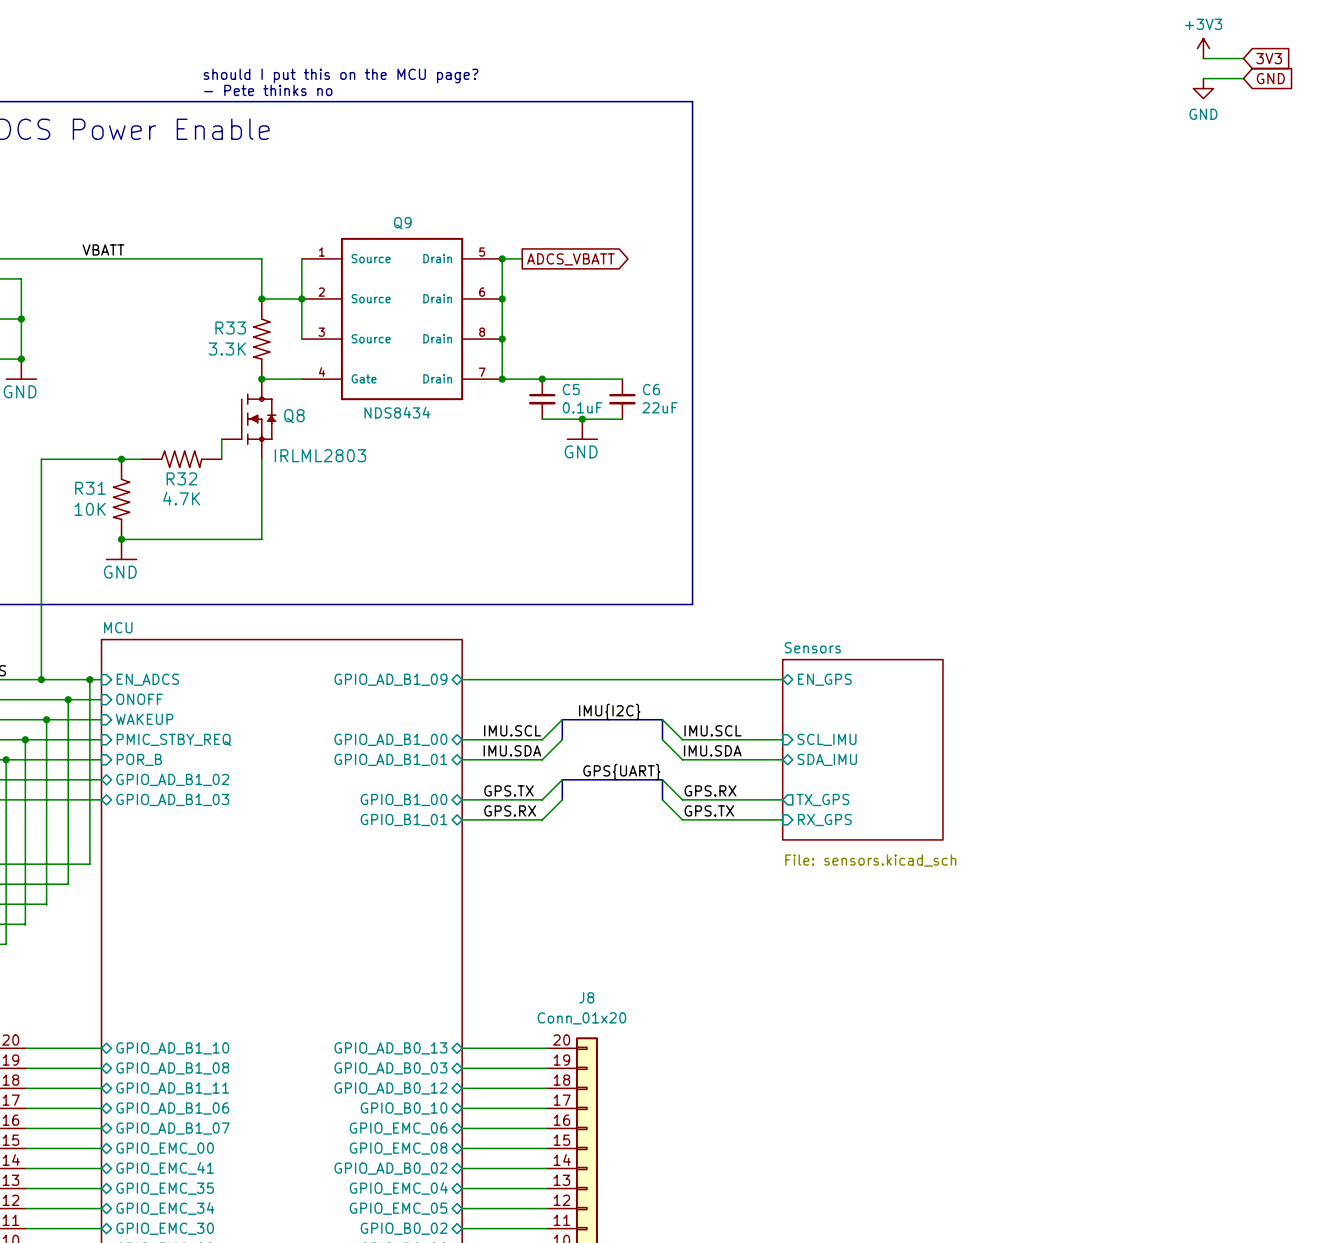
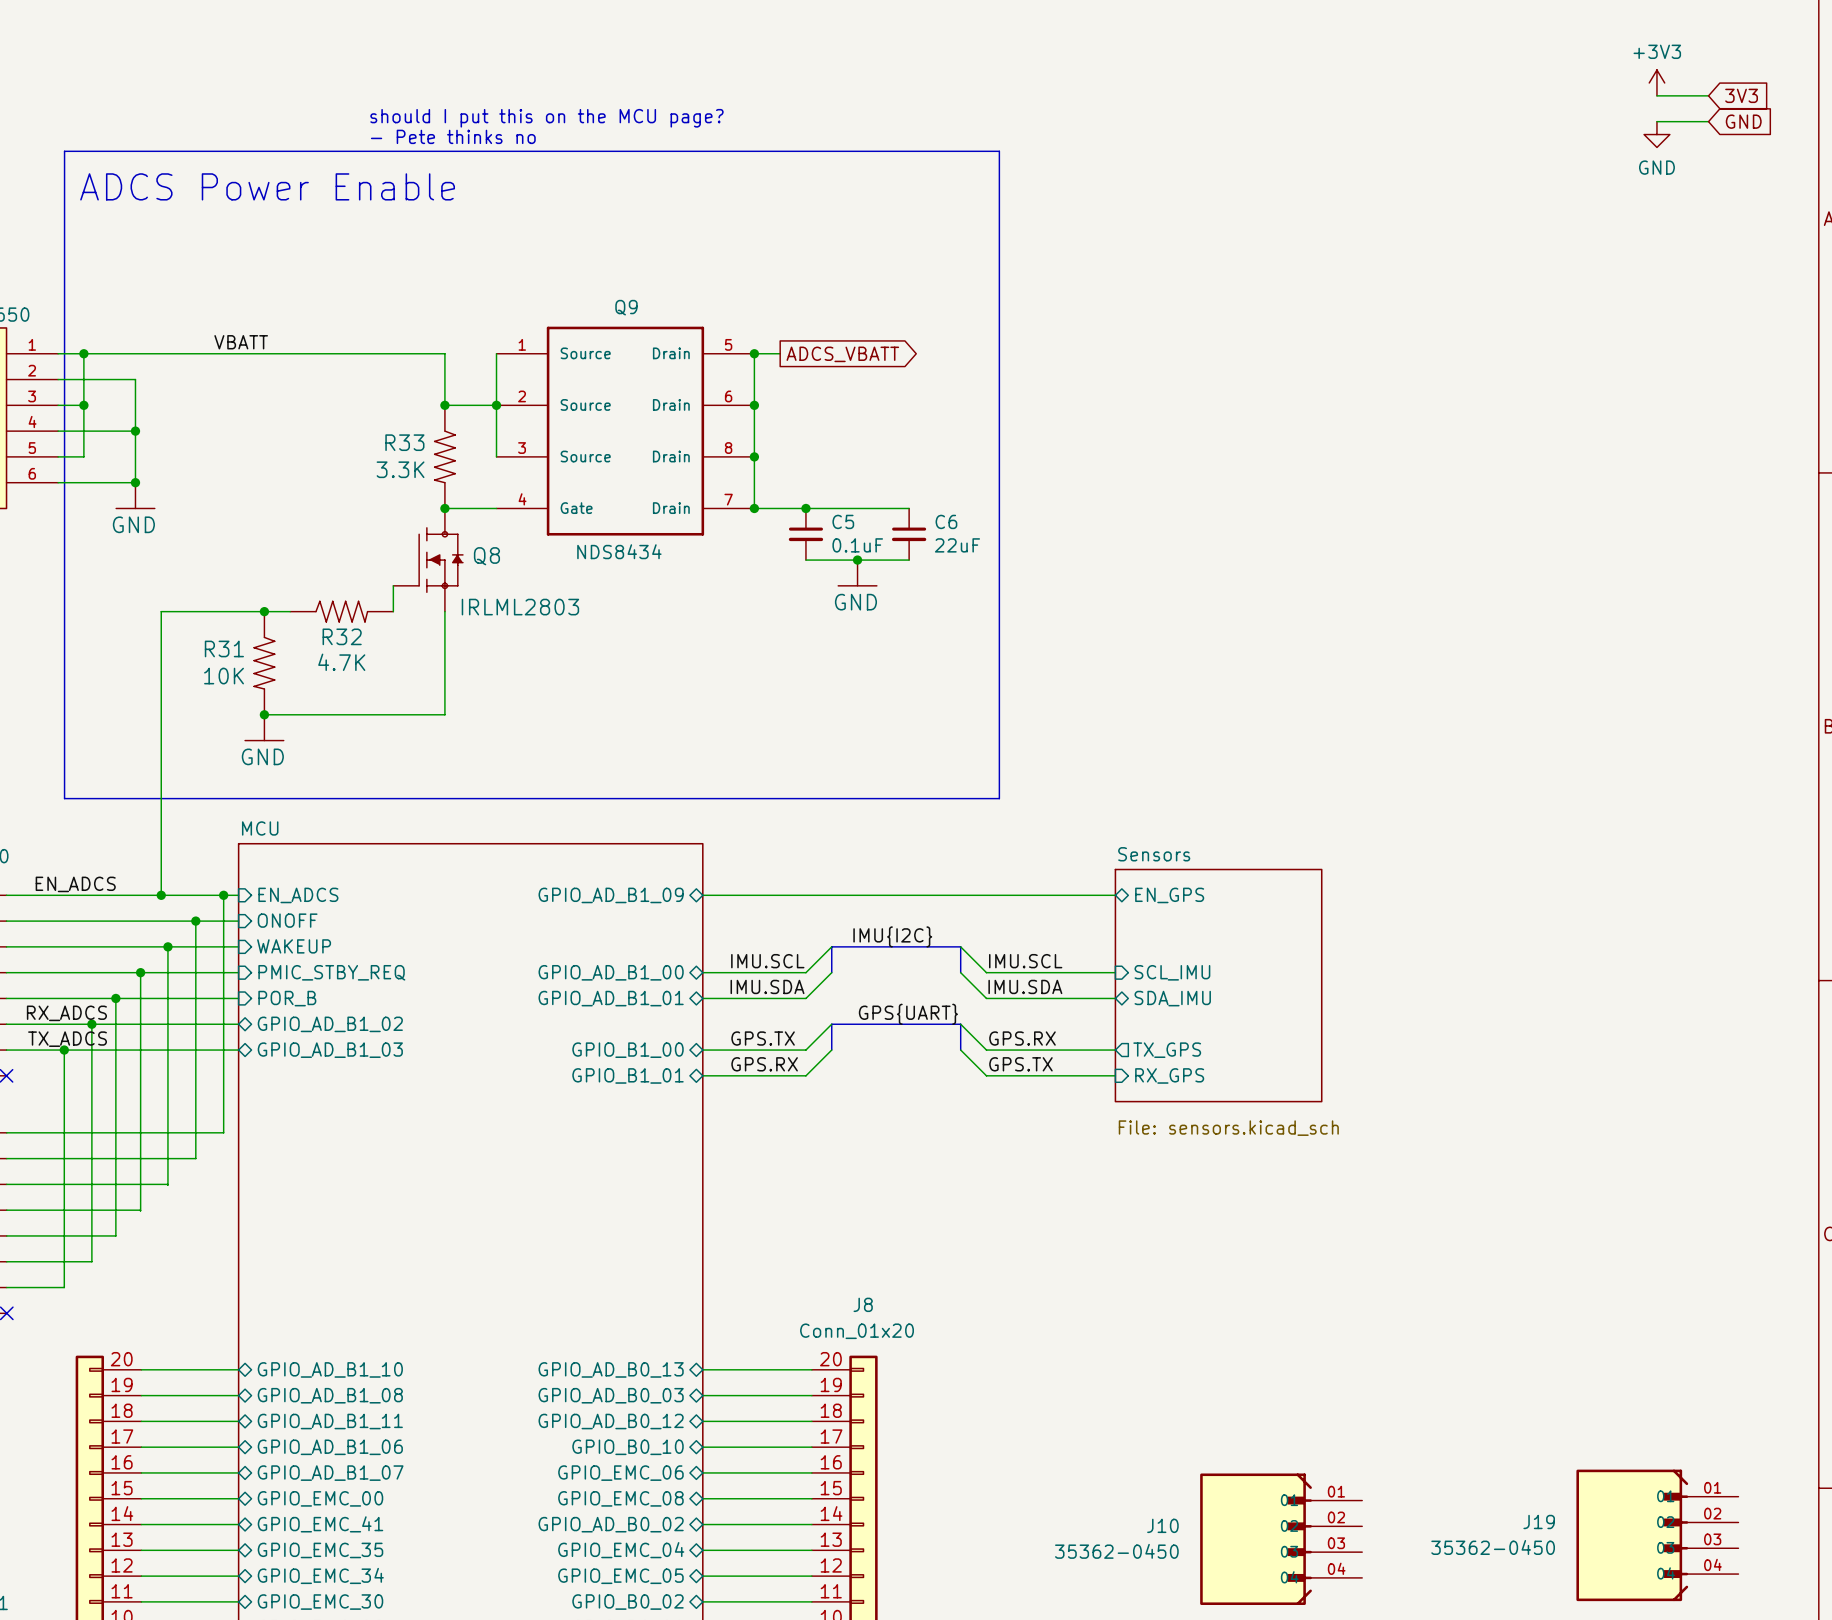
J19: none -> 35362-0450 (1657, 1535)
J10: none -> 35362-0450 (1281, 1539)

